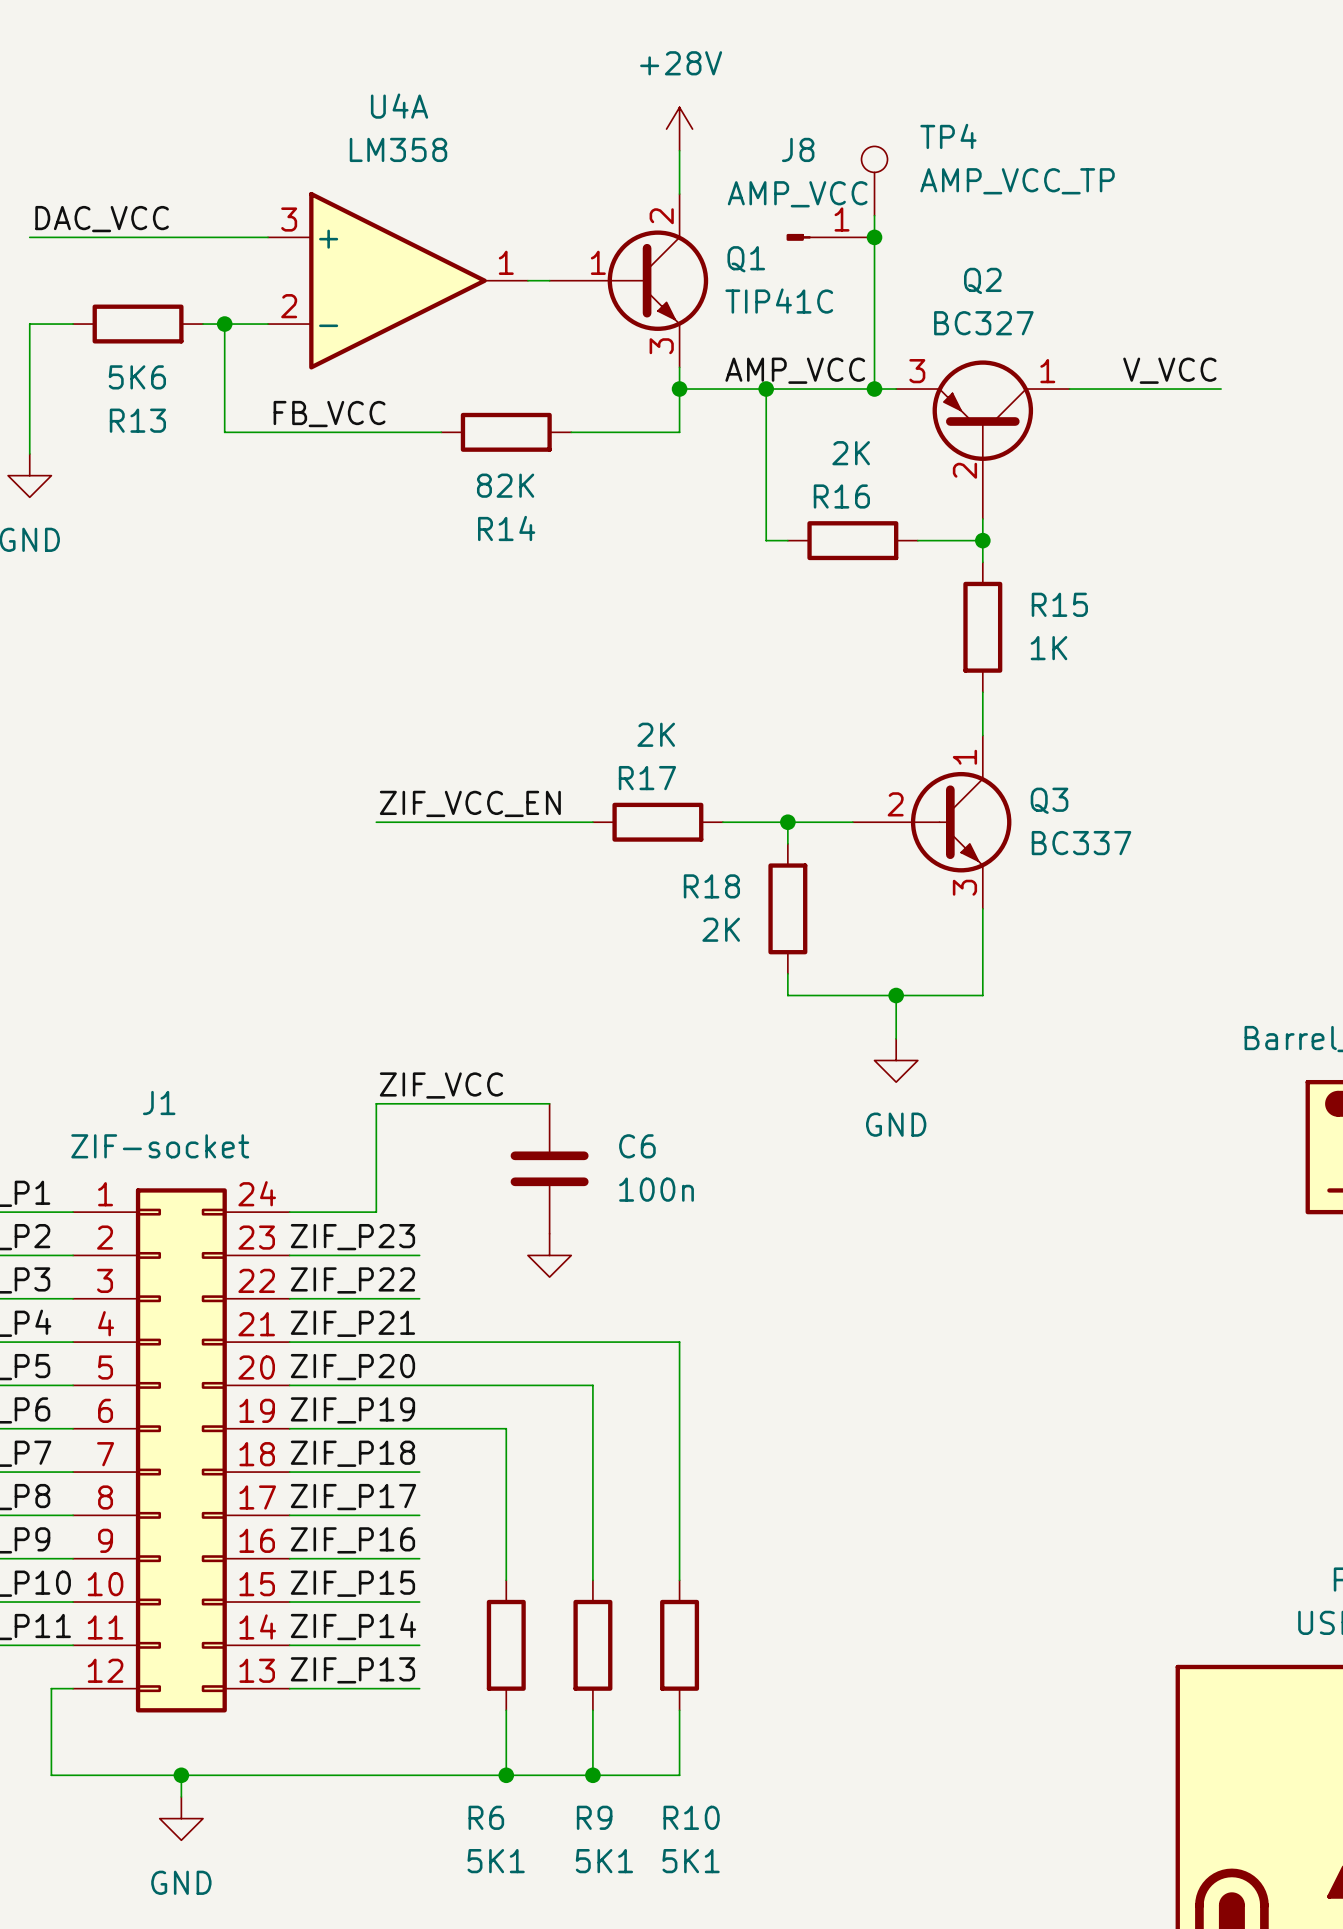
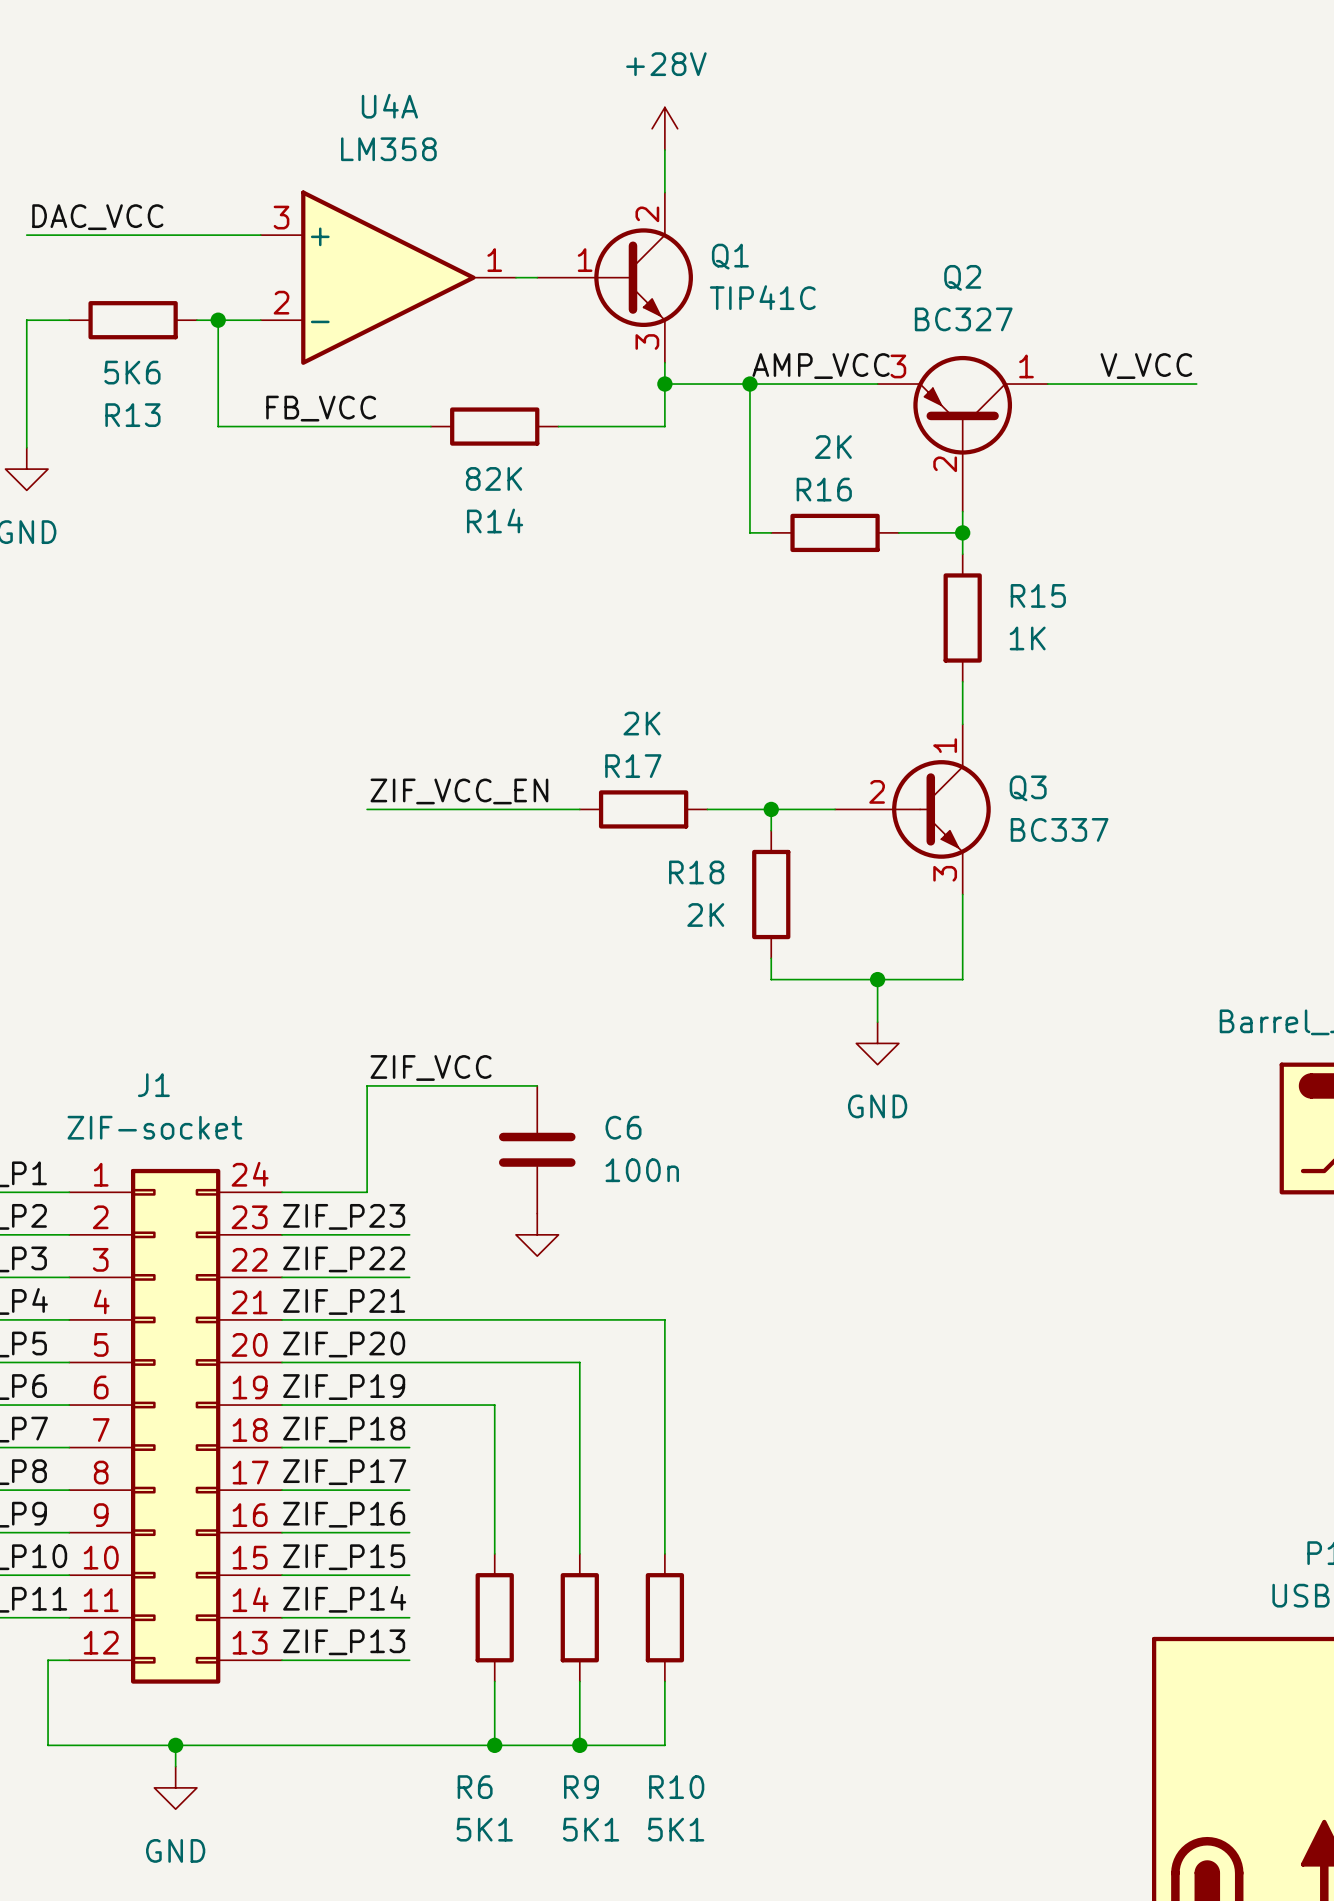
TP4: AMP_VCC_TP (874, 181) -> none
wire: (874, 215) (874, 389) -> none
J8: AMP_VCC (830, 237) -> none
junction: (874, 237) -> none
label position: AMP_VCC (795, 370) -> AMP_VCC (821, 366)
junction: (874, 389) -> none

